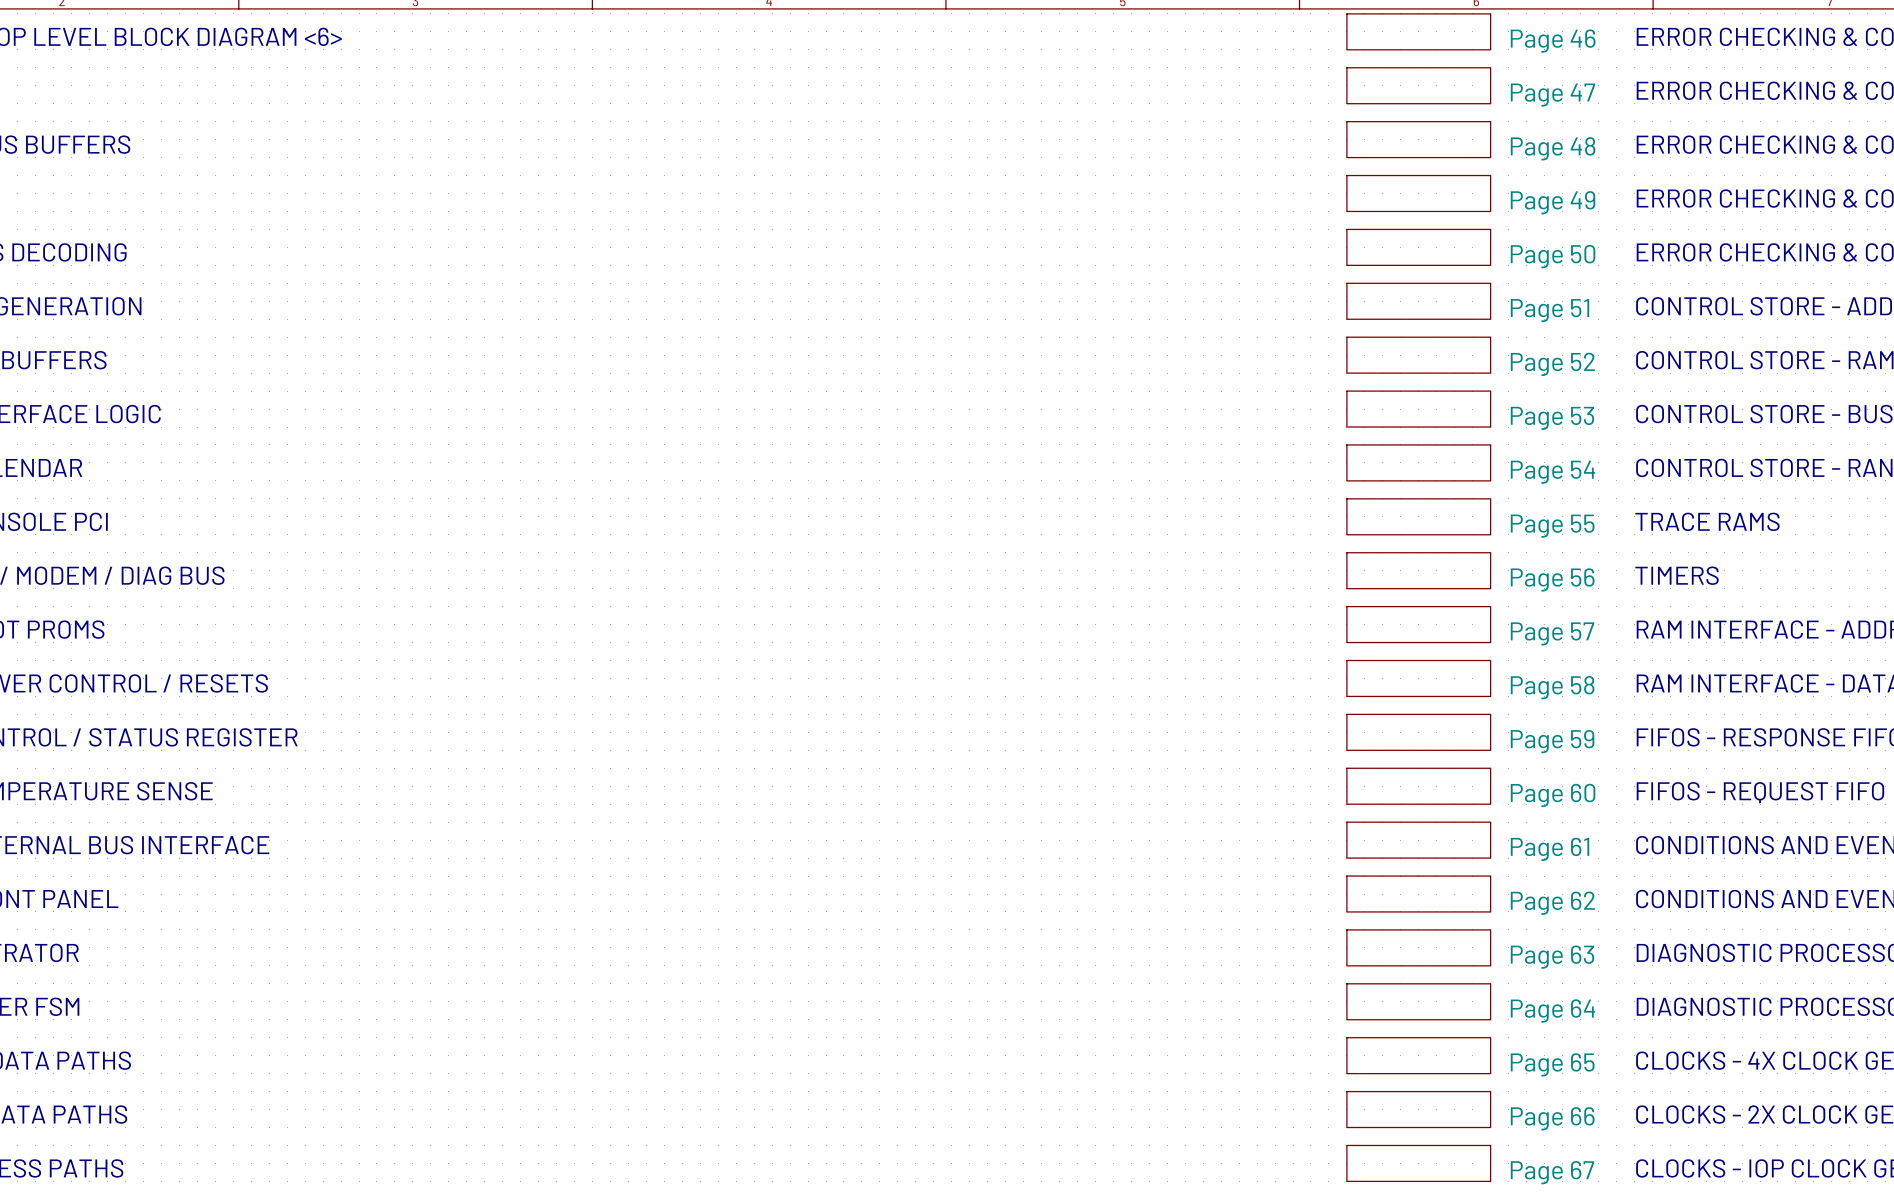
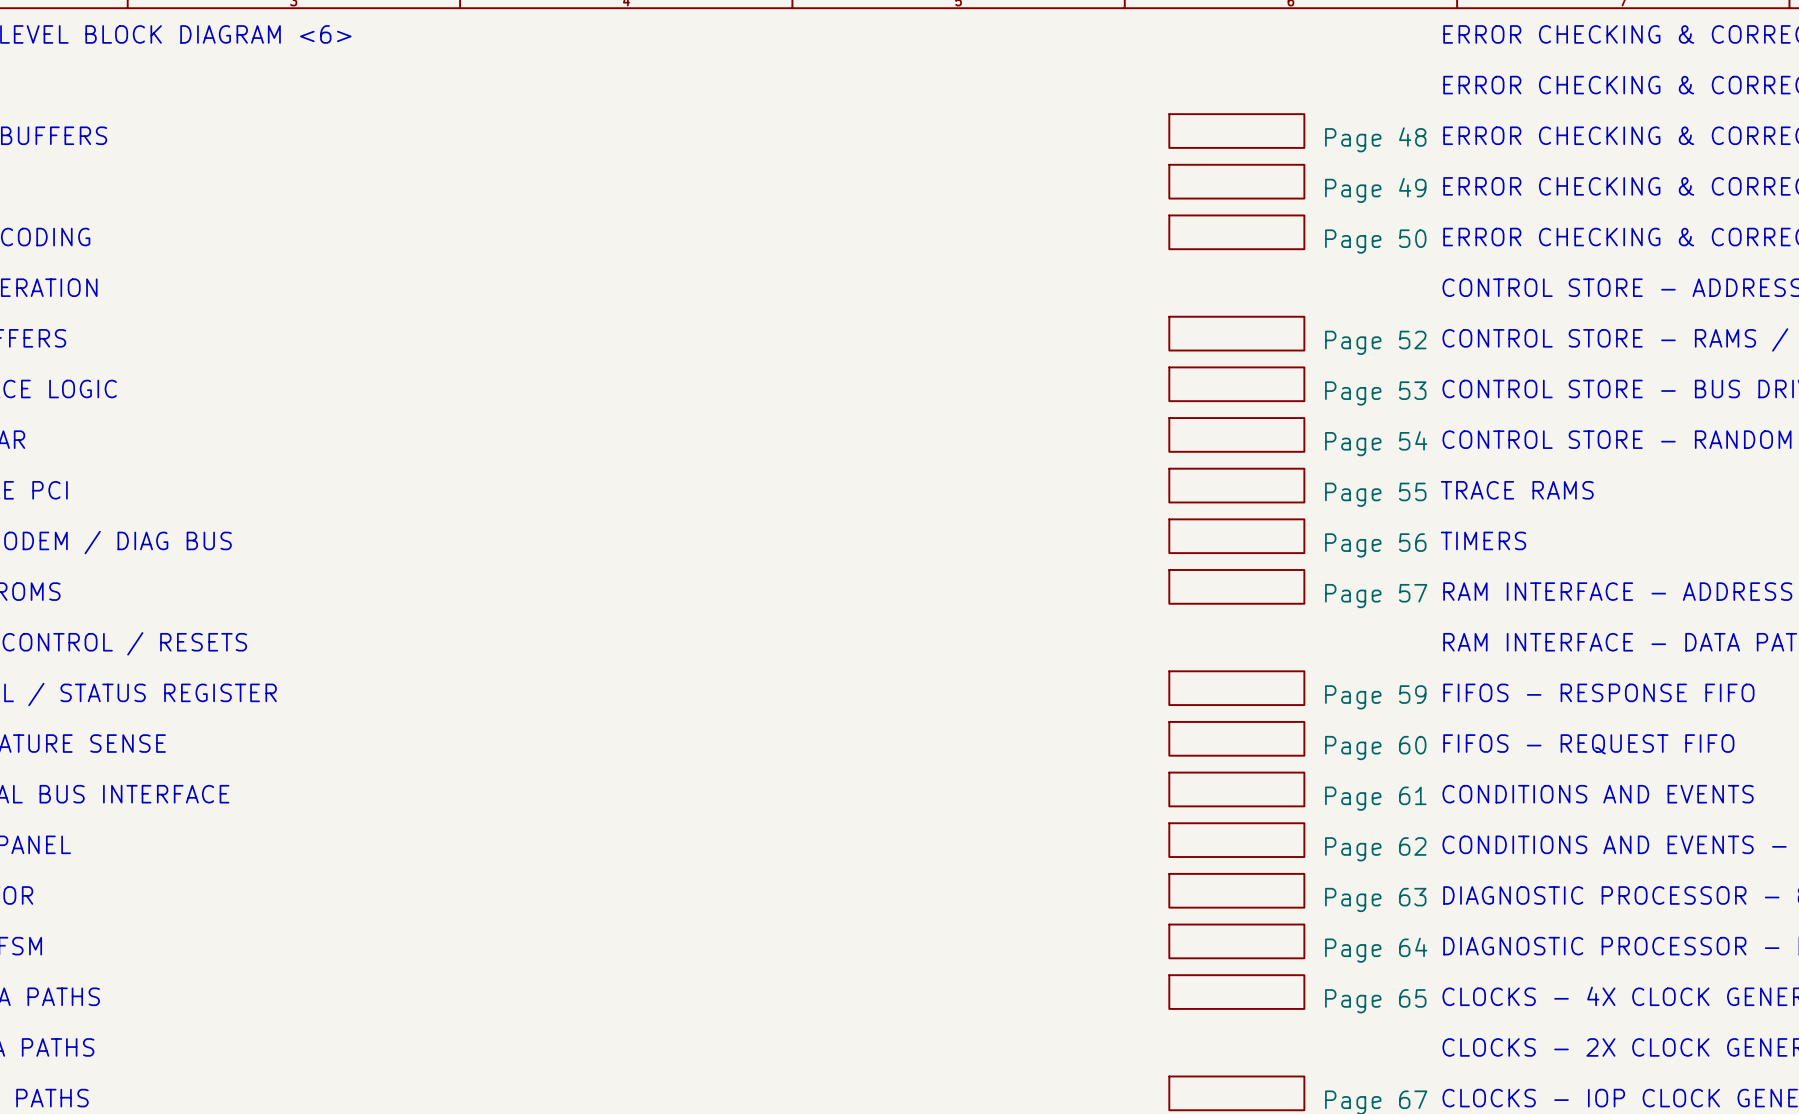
sheet Page 46: (1418, 31) -> none
sheet Page 47: (1418, 85) -> none
sheet Page 51: (1418, 301) -> none
sheet Page 58: (1418, 678) -> none
sheet Page 66: (1418, 1109) -> none

